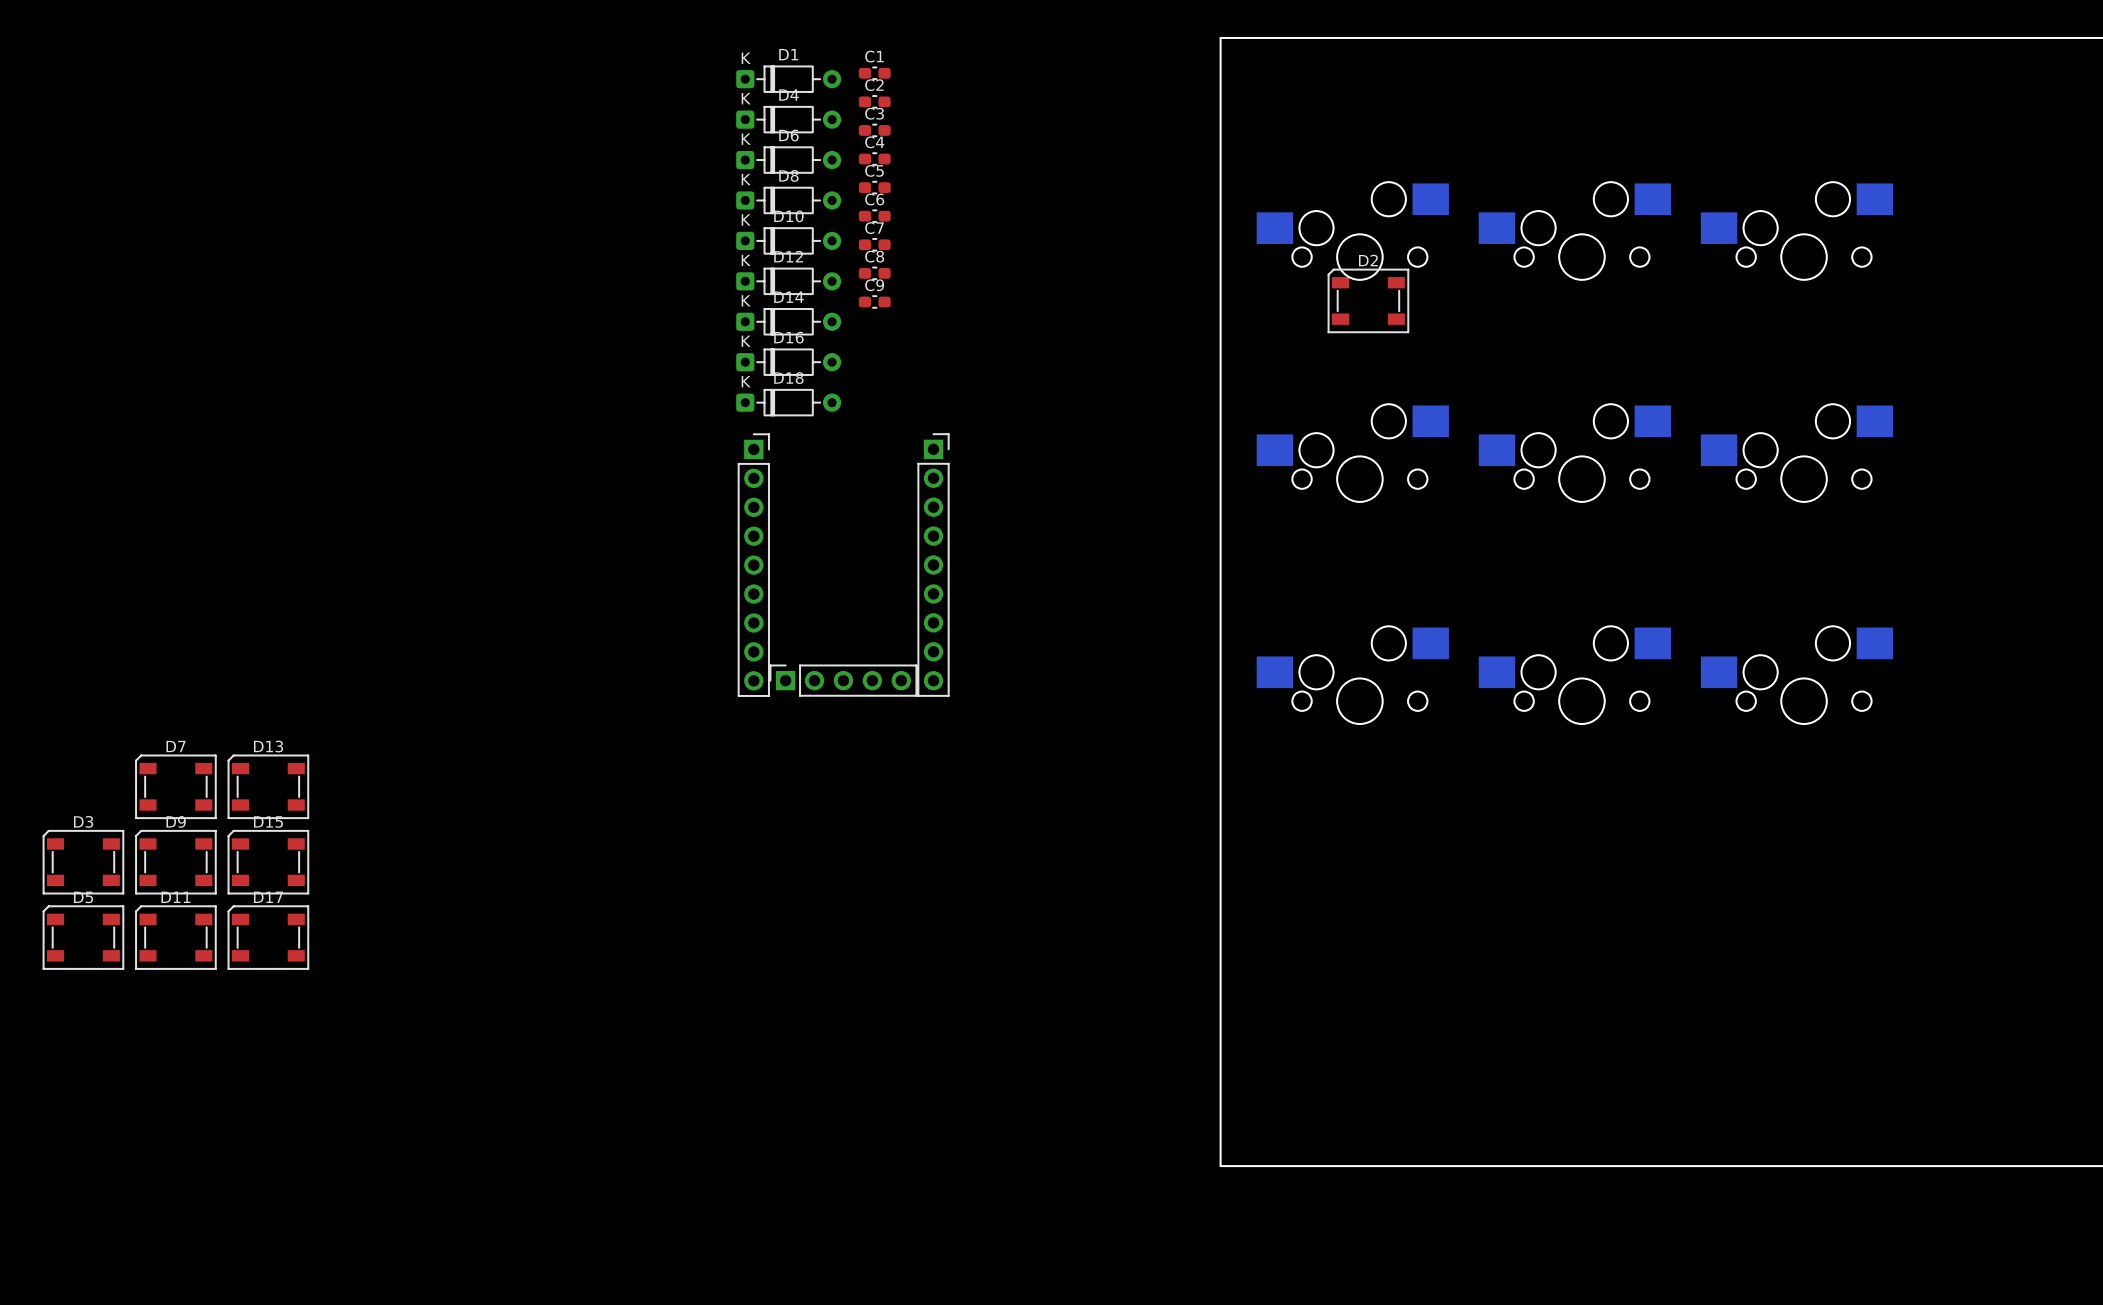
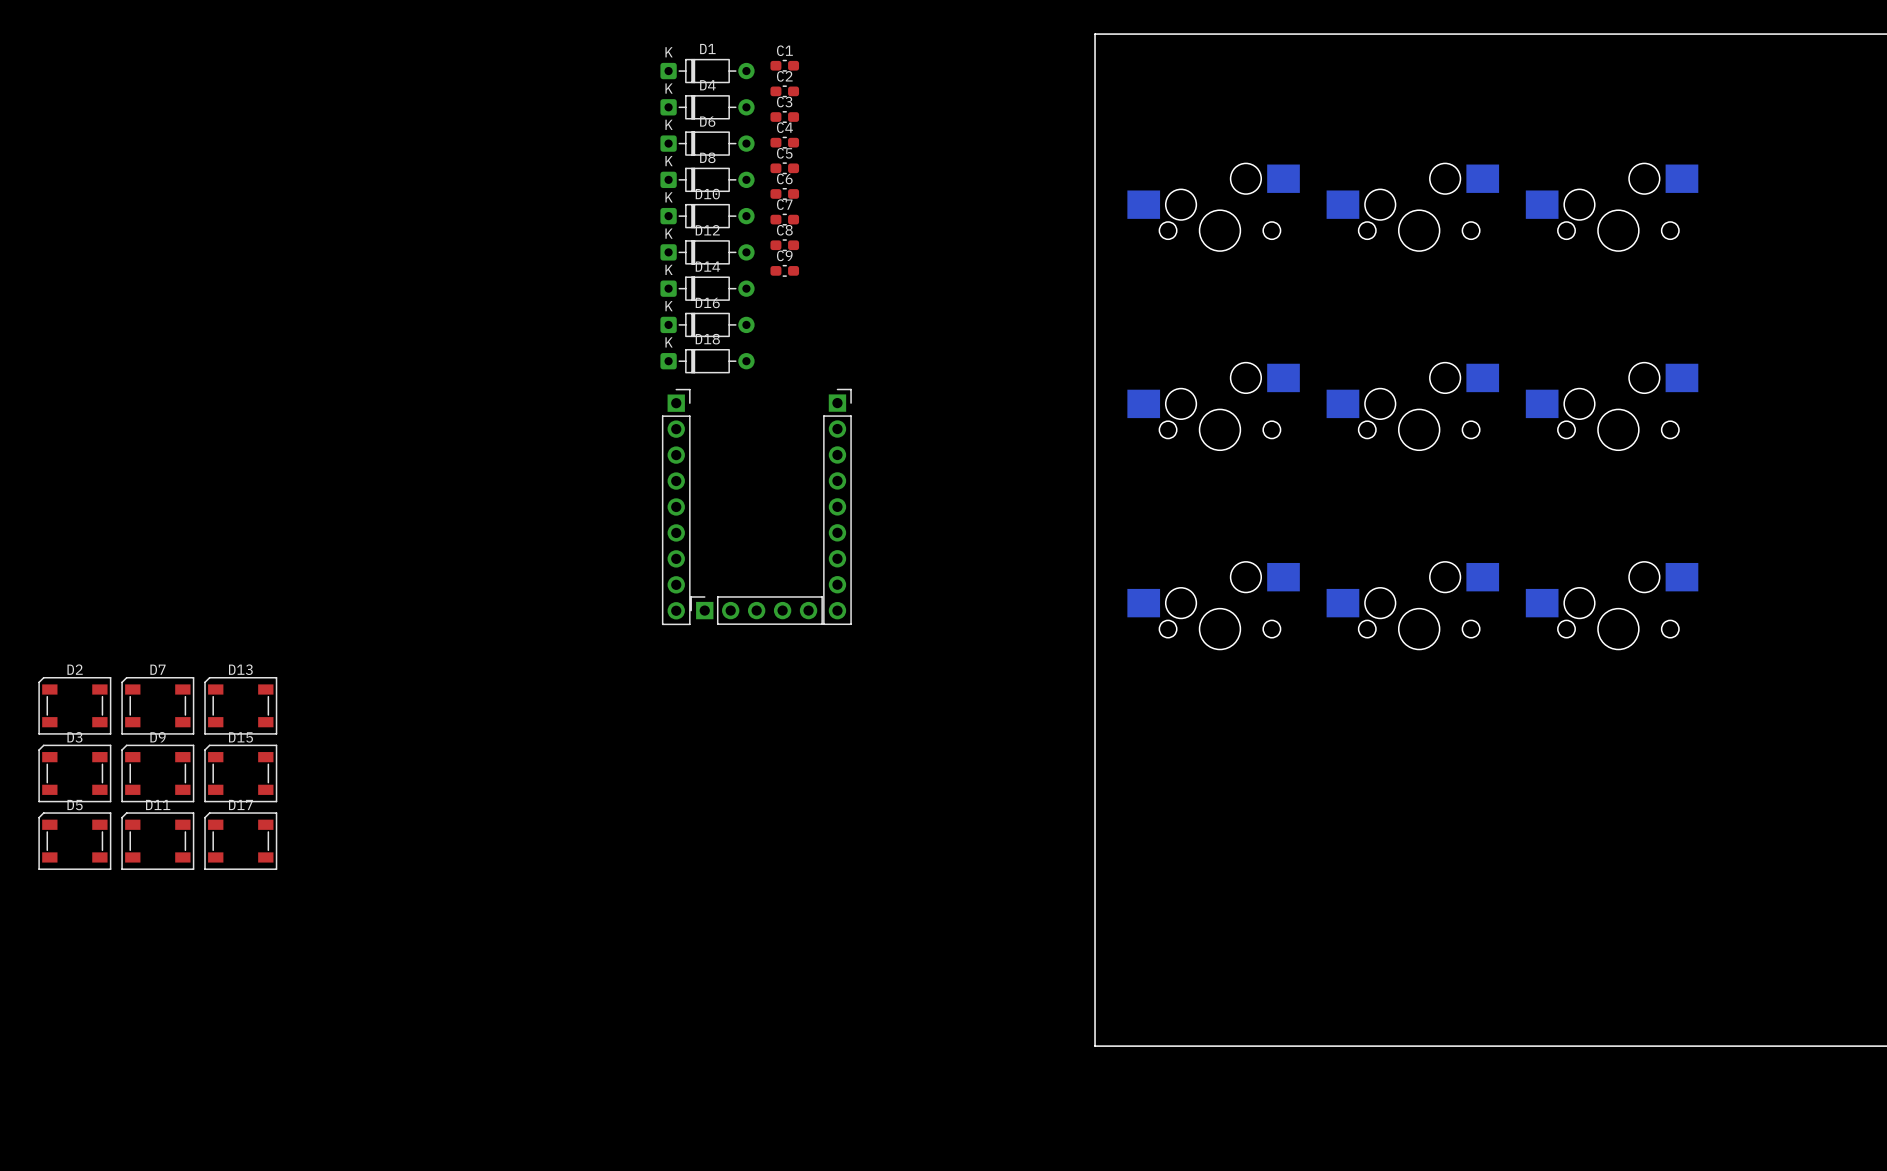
D2 position: (1368, 300) -> (74, 705)

